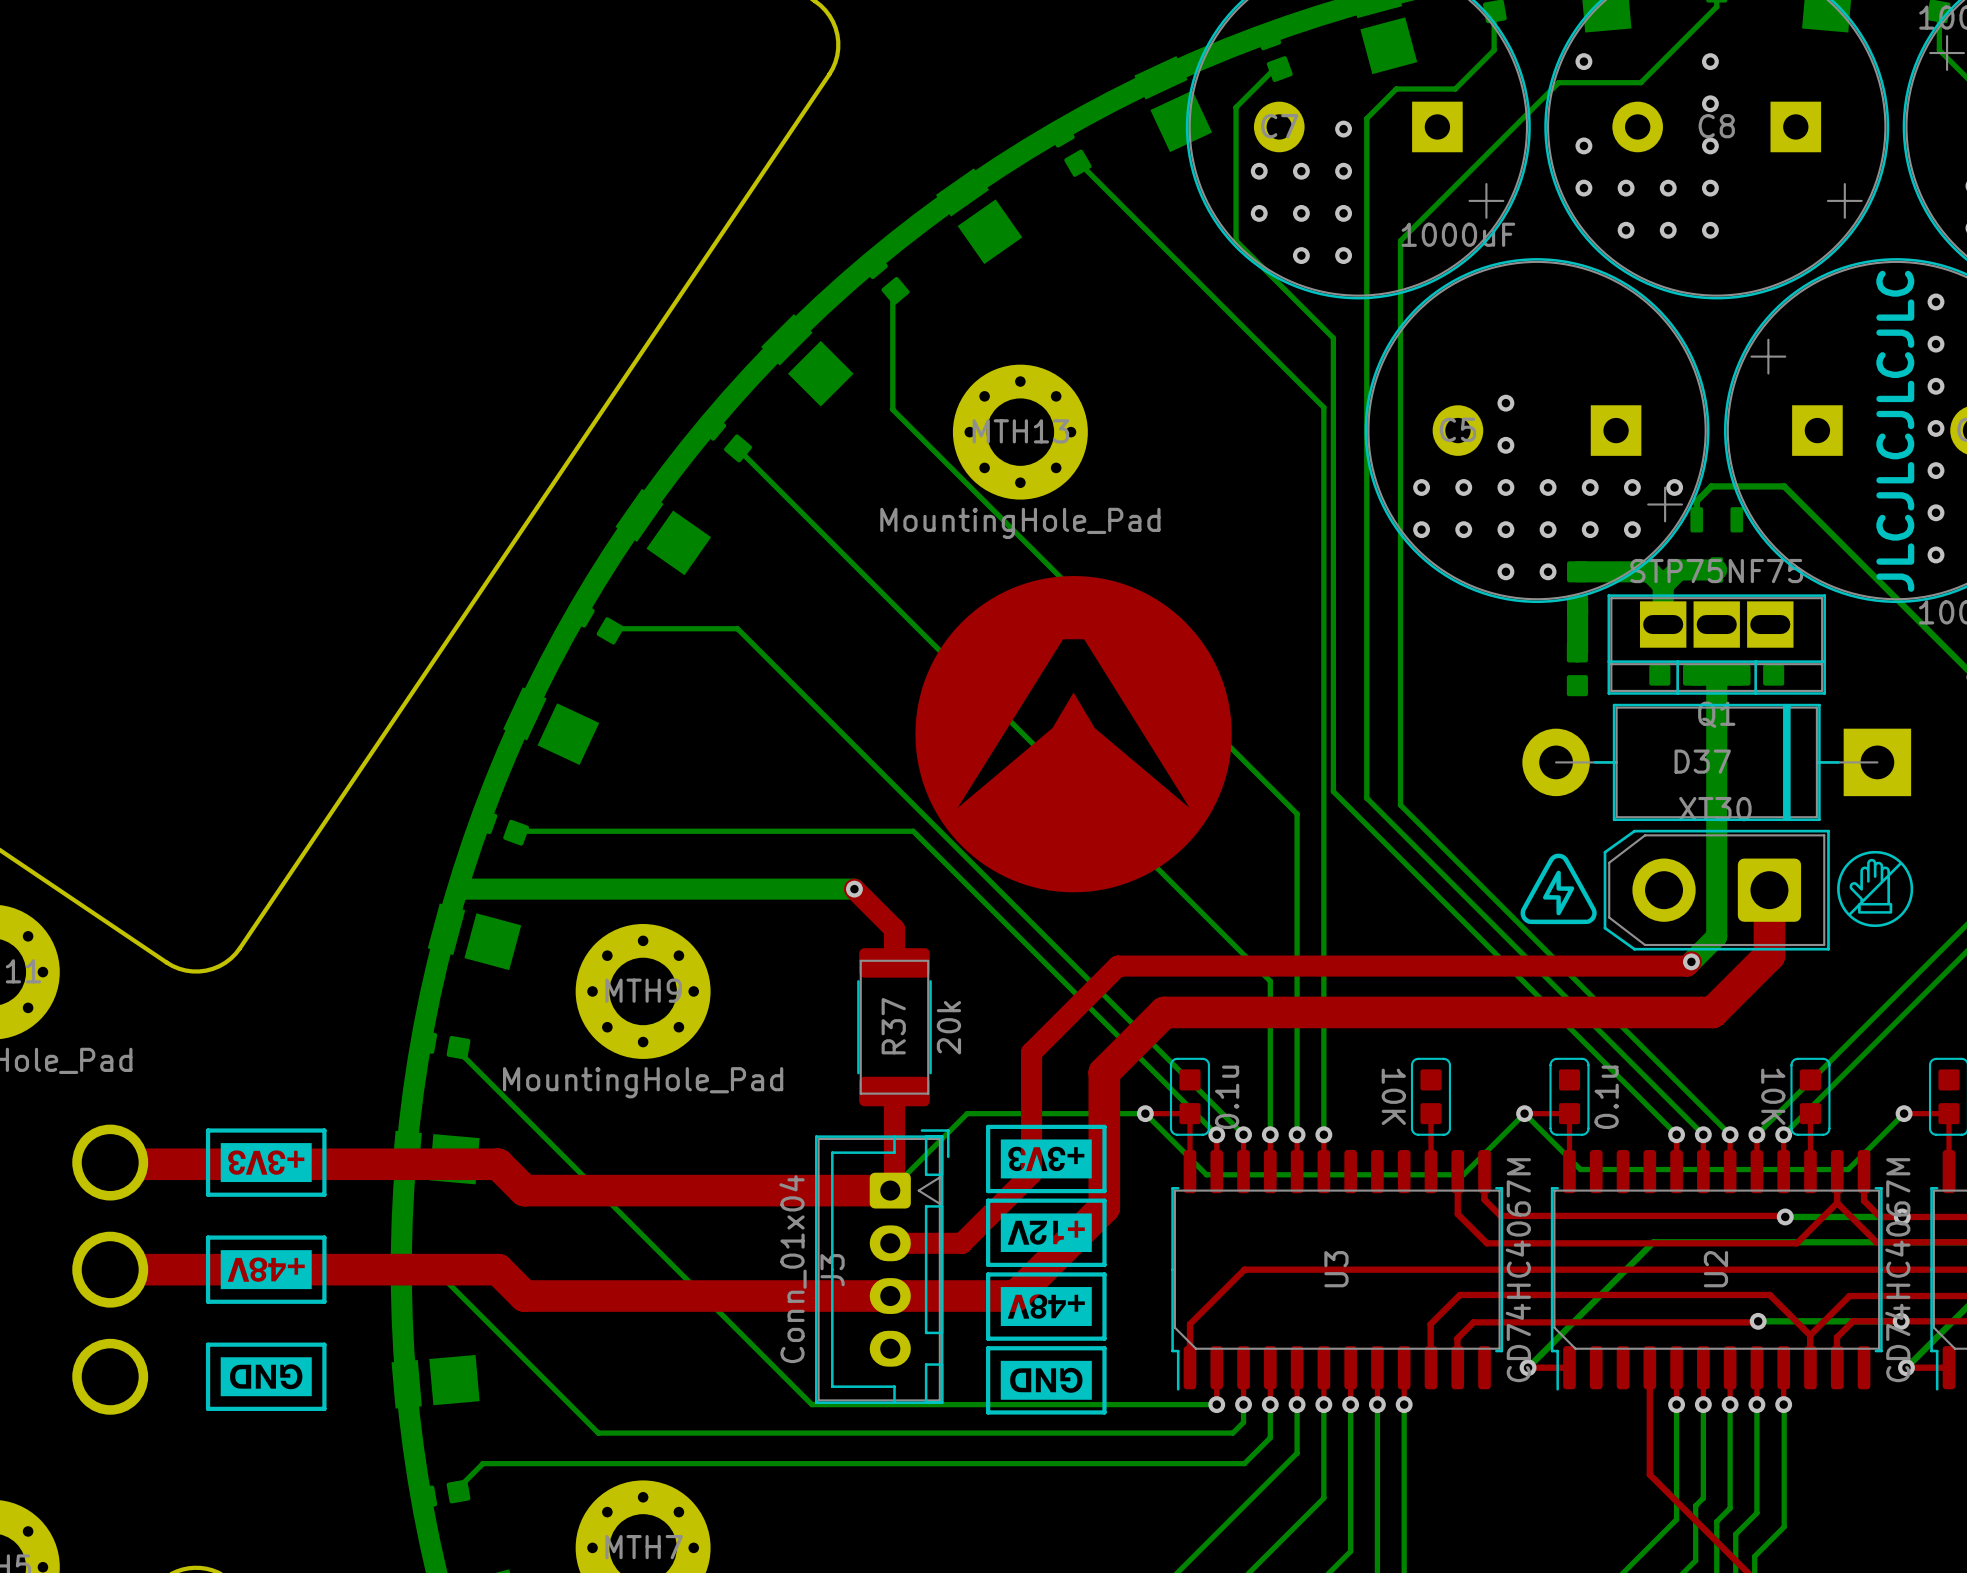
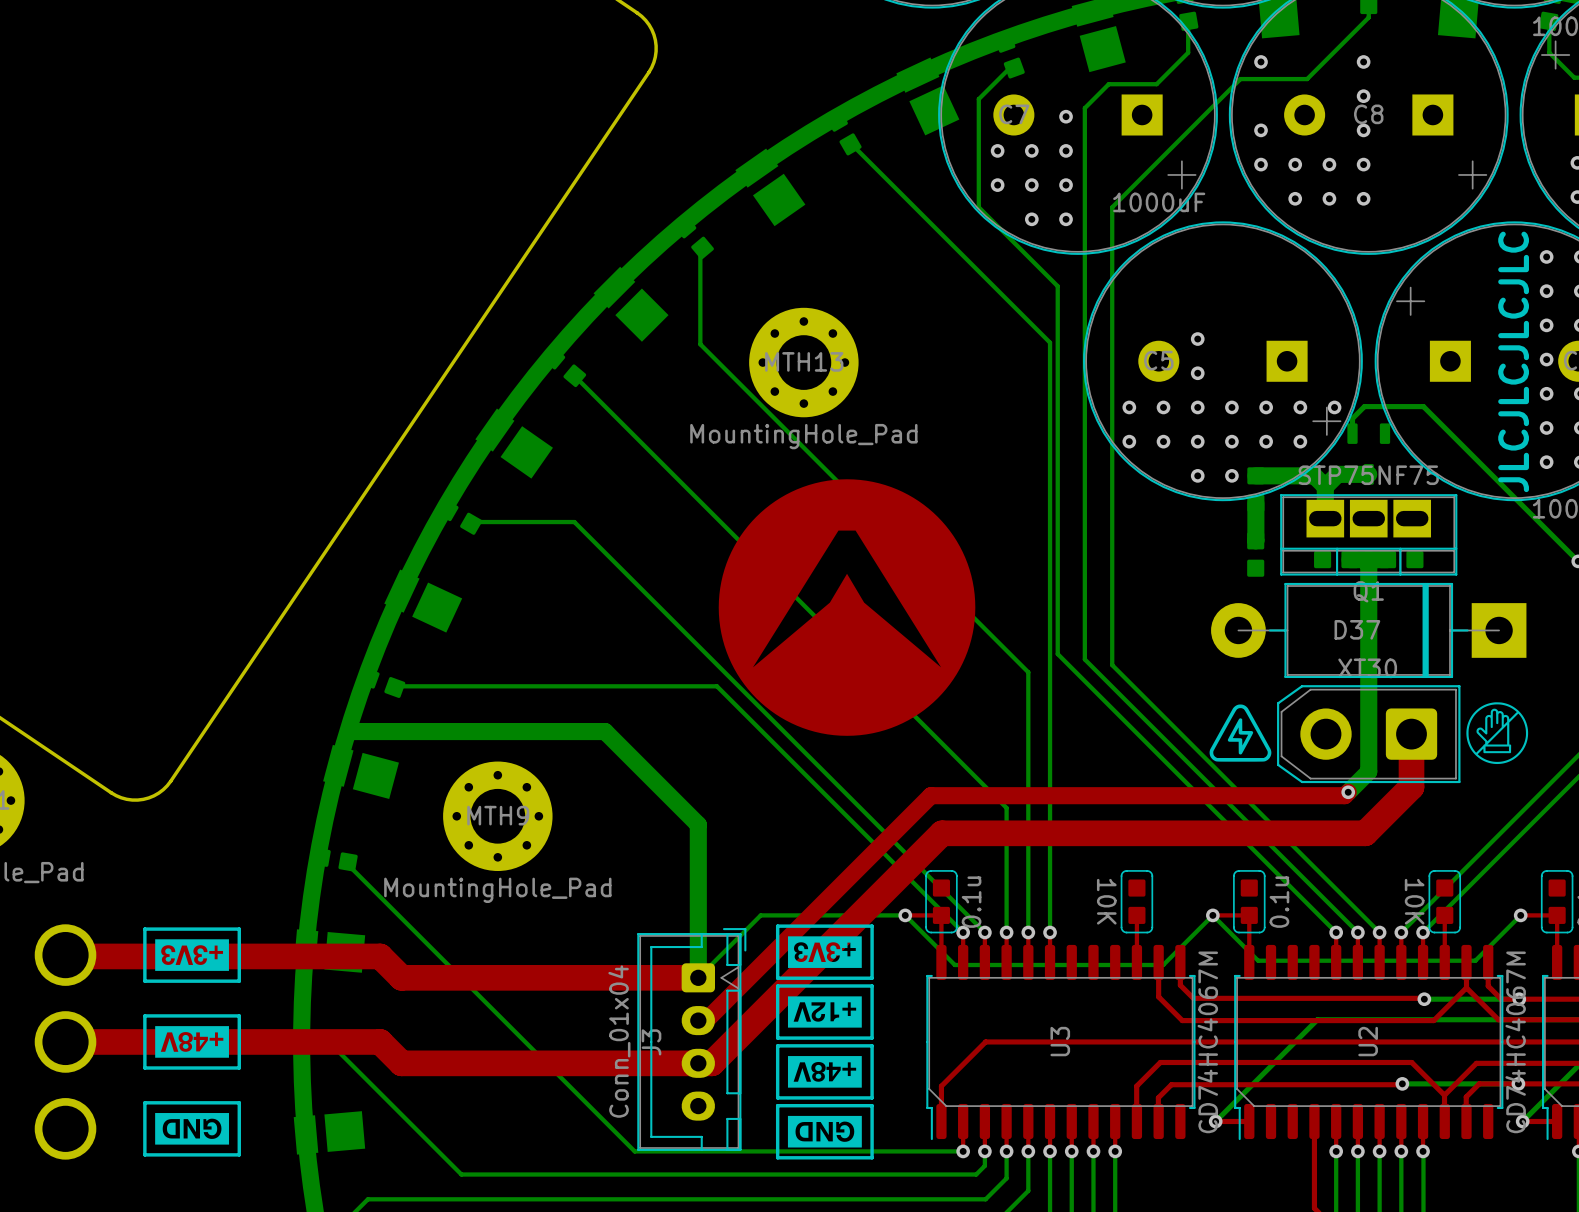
bottom track: none -> (348, 731) (605, 731) (698, 824) (698, 977)
bottom track: (463, 889) (854, 889) -> none
top track: (854, 889) (894, 929) (894, 962) -> none
via: (854, 889) -> none
top track: (1177, 966) (1117, 966) (1031, 1052) (1031, 1173) (961, 1243) (899, 1243) -> (930, 795) (706, 1020)
top track: (1190, 1012) (1164, 1012) (1104, 1072) (1104, 1207) (1015, 1296) (907, 1296) -> (942, 833) (712, 1063)
R37: 20k (894, 1027) -> none
top track: (894, 1091) (894, 1186) (890, 1190) -> none

